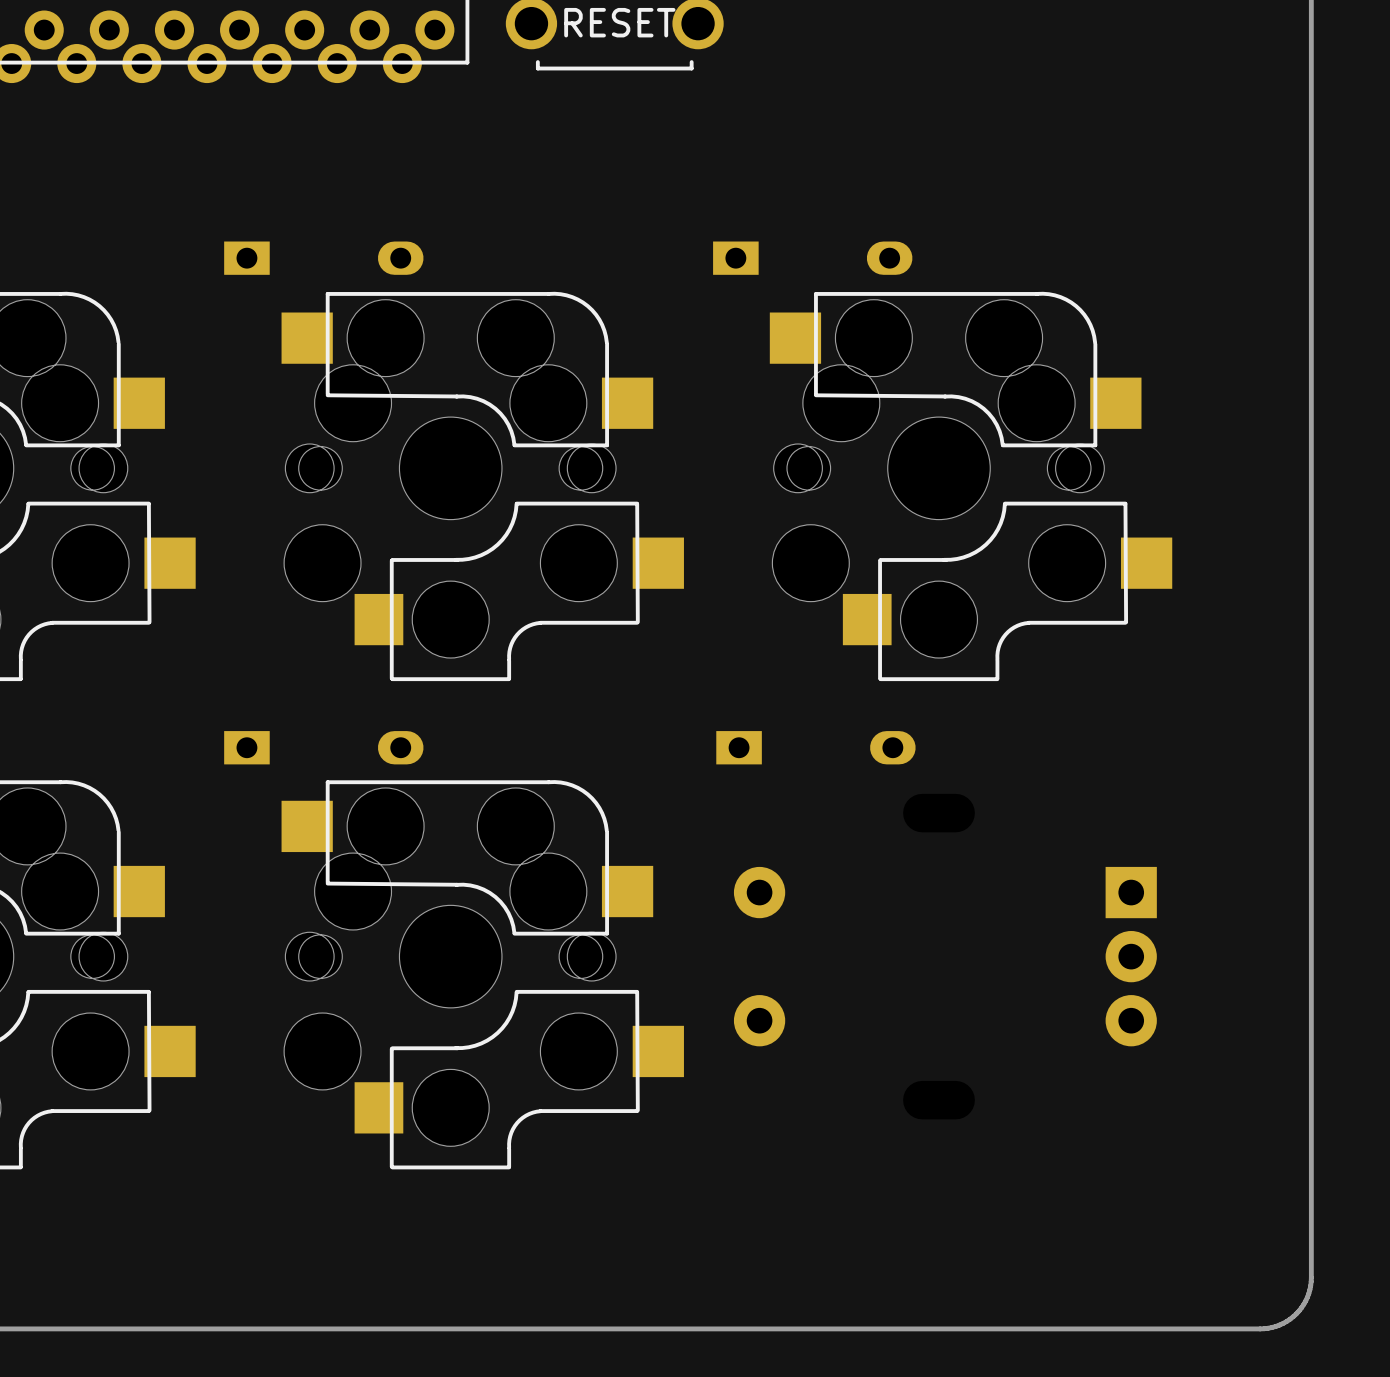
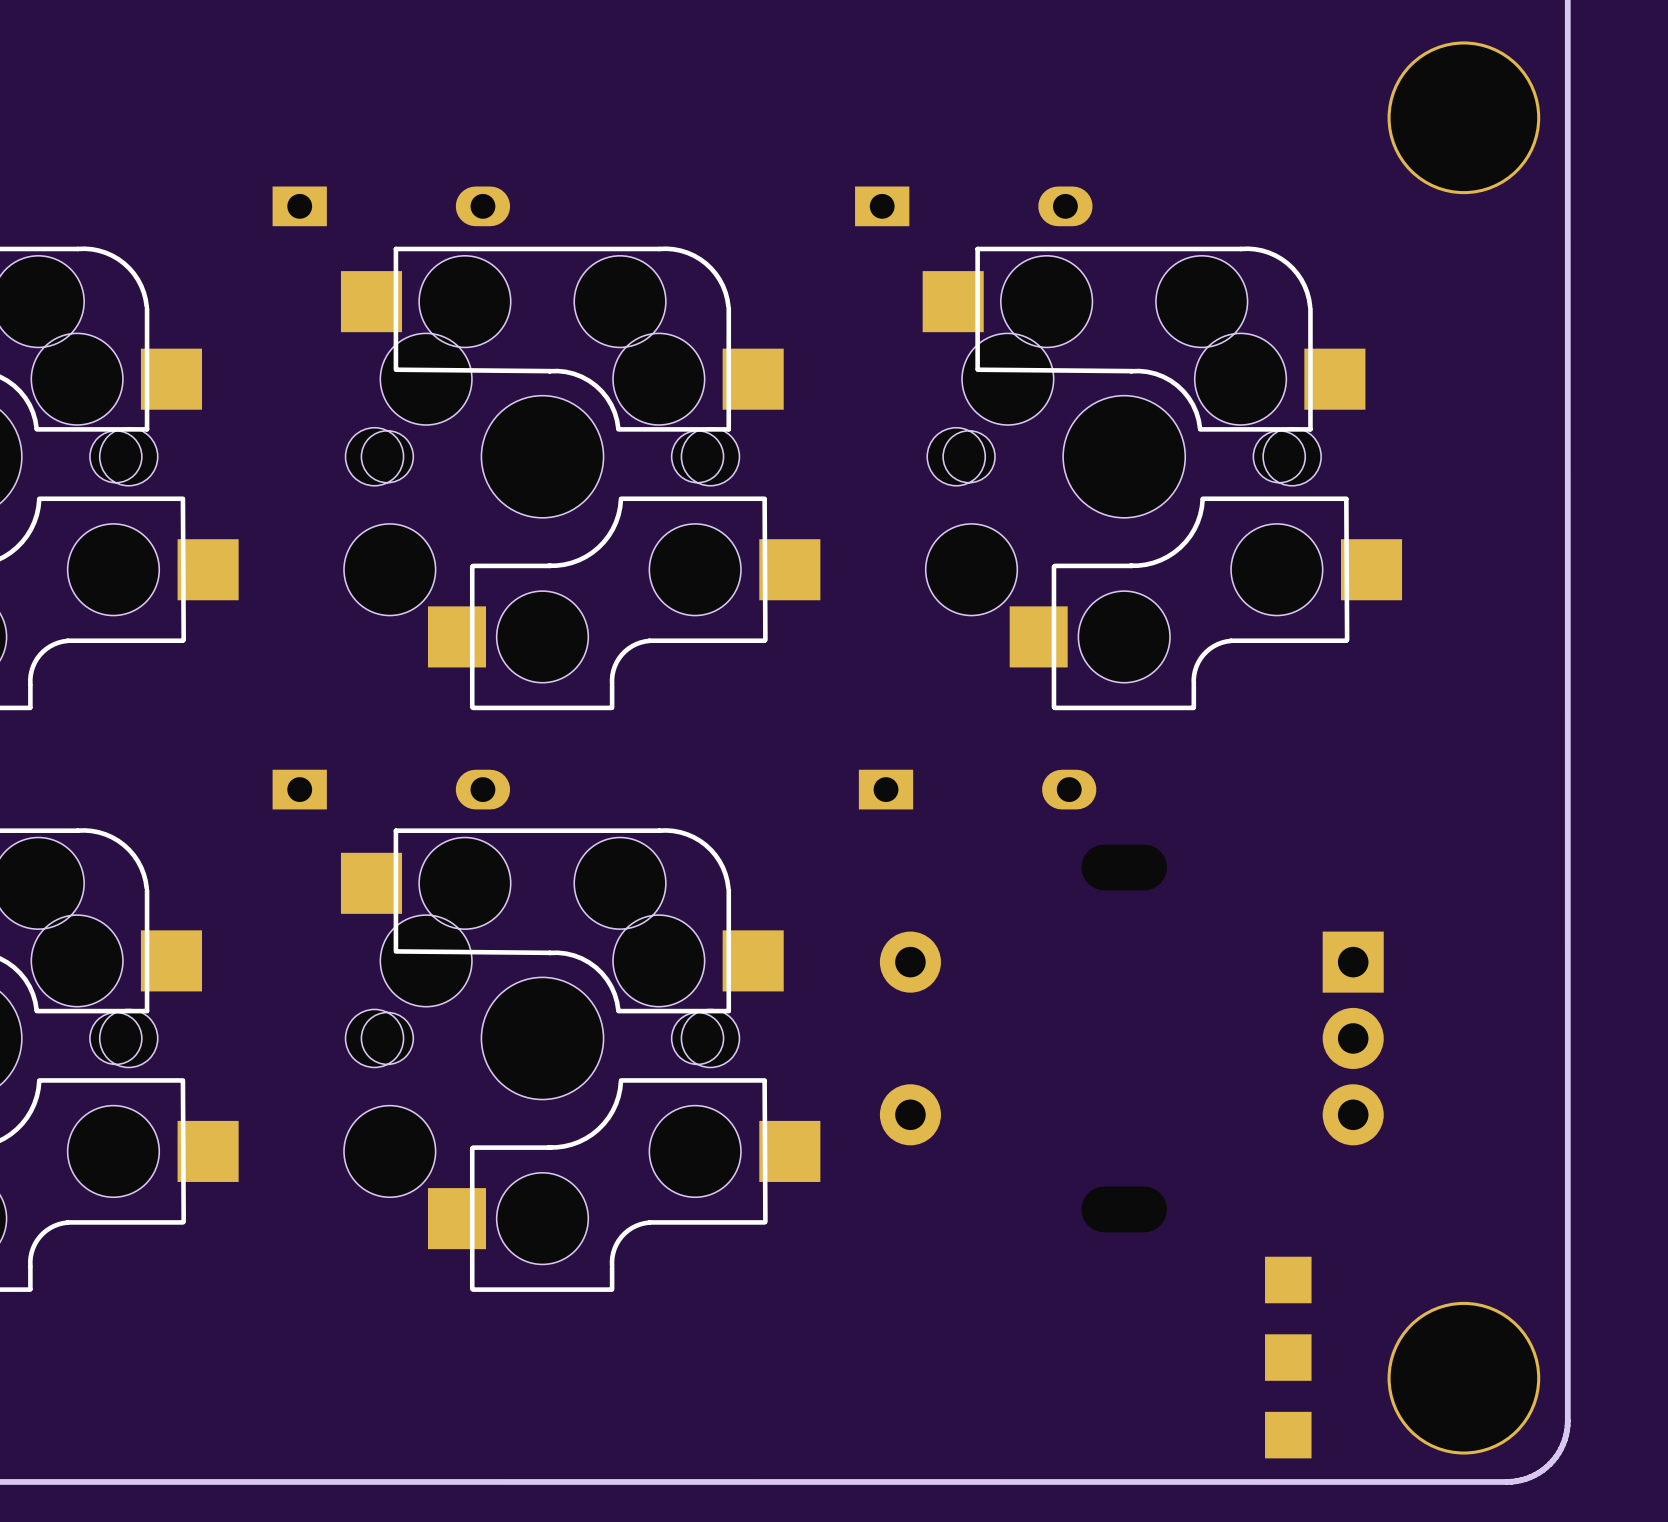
part: none -> (1463, 117)
part: none -> (1288, 1357)
part: none -> (1463, 1378)

